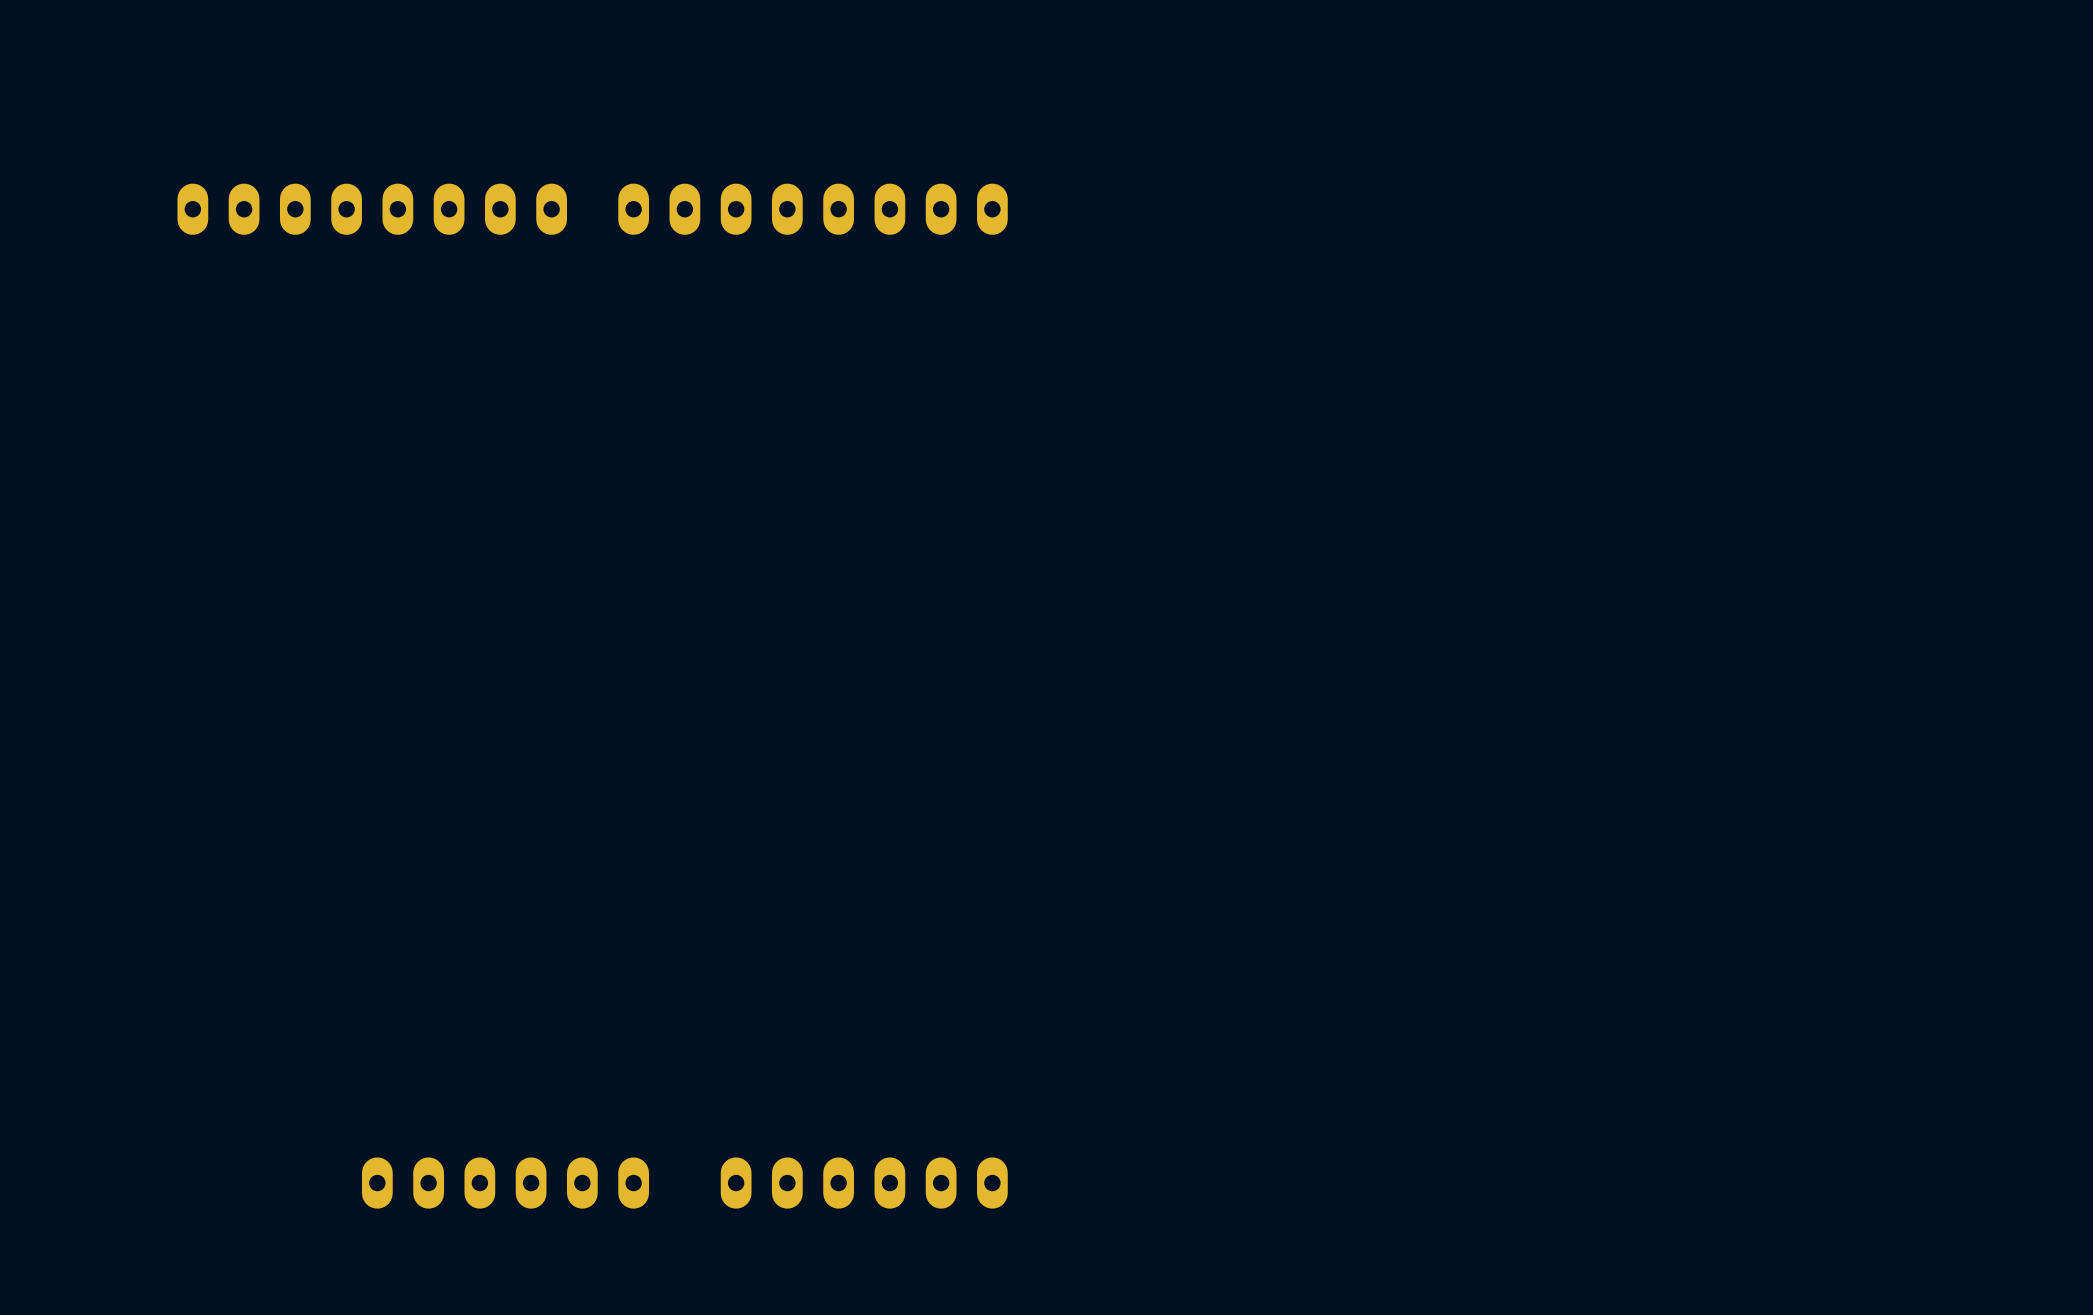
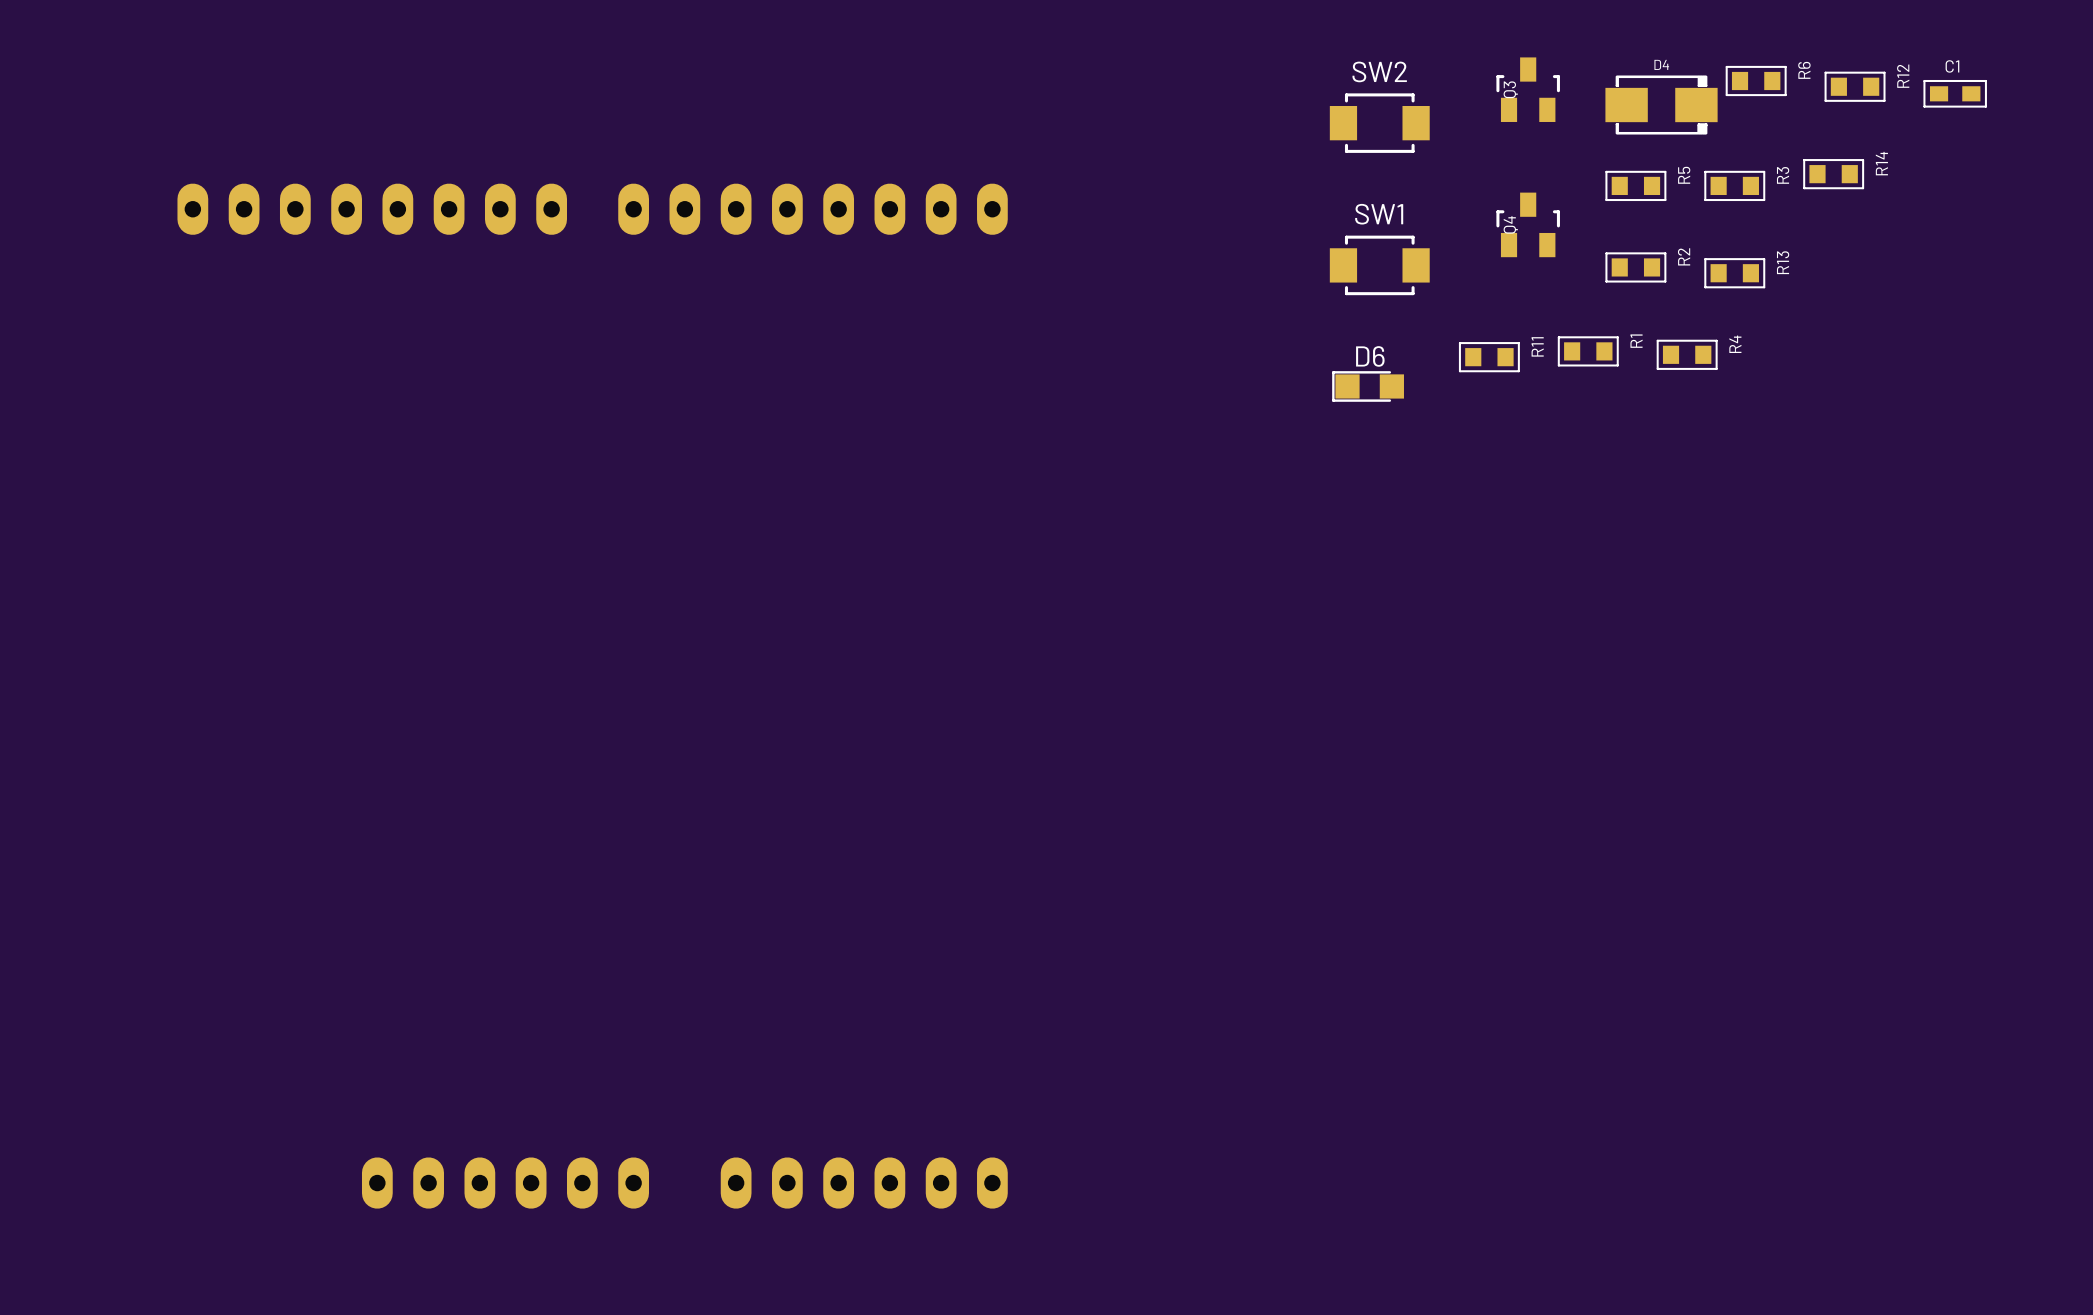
R6: none -> (1756, 81)
R12: none -> (1855, 86)
Q3: none -> (1528, 89)
C1: none -> (1955, 93)
D4: none -> (1661, 105)
SW2: none -> (1379, 123)
R14: none -> (1833, 174)
R5: none -> (1635, 185)
R3: none -> (1734, 185)
Q4: none -> (1528, 224)
SW1: none -> (1379, 265)
R2: none -> (1635, 267)
R13: none -> (1734, 273)
R1: none -> (1588, 351)
R4: none -> (1687, 354)
R11: none -> (1489, 357)
D6: none -> (1368, 386)

